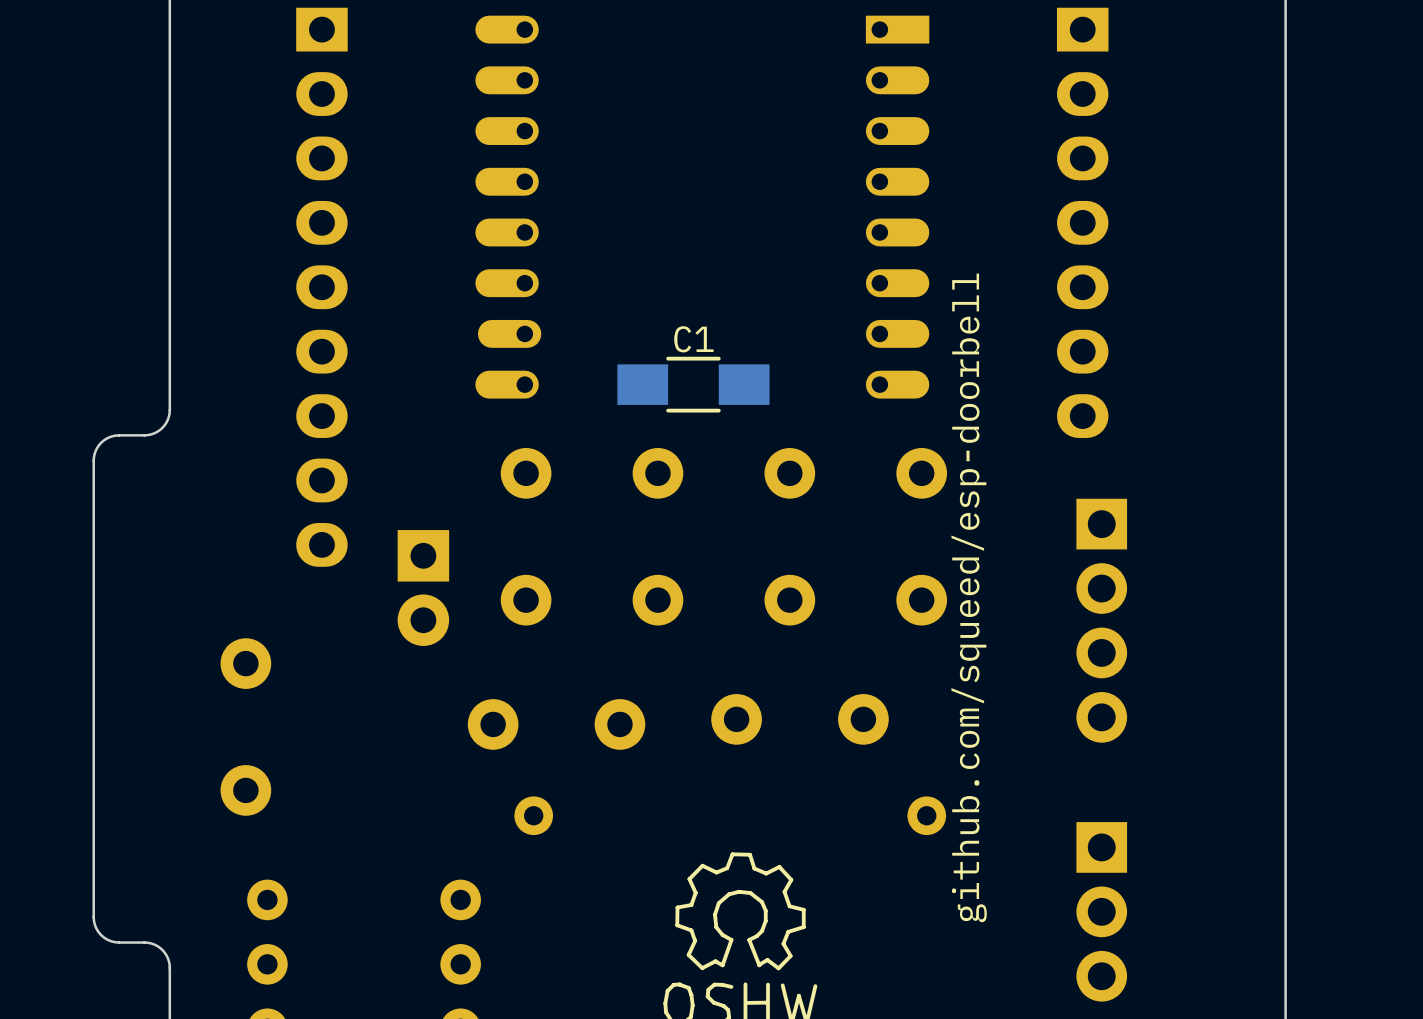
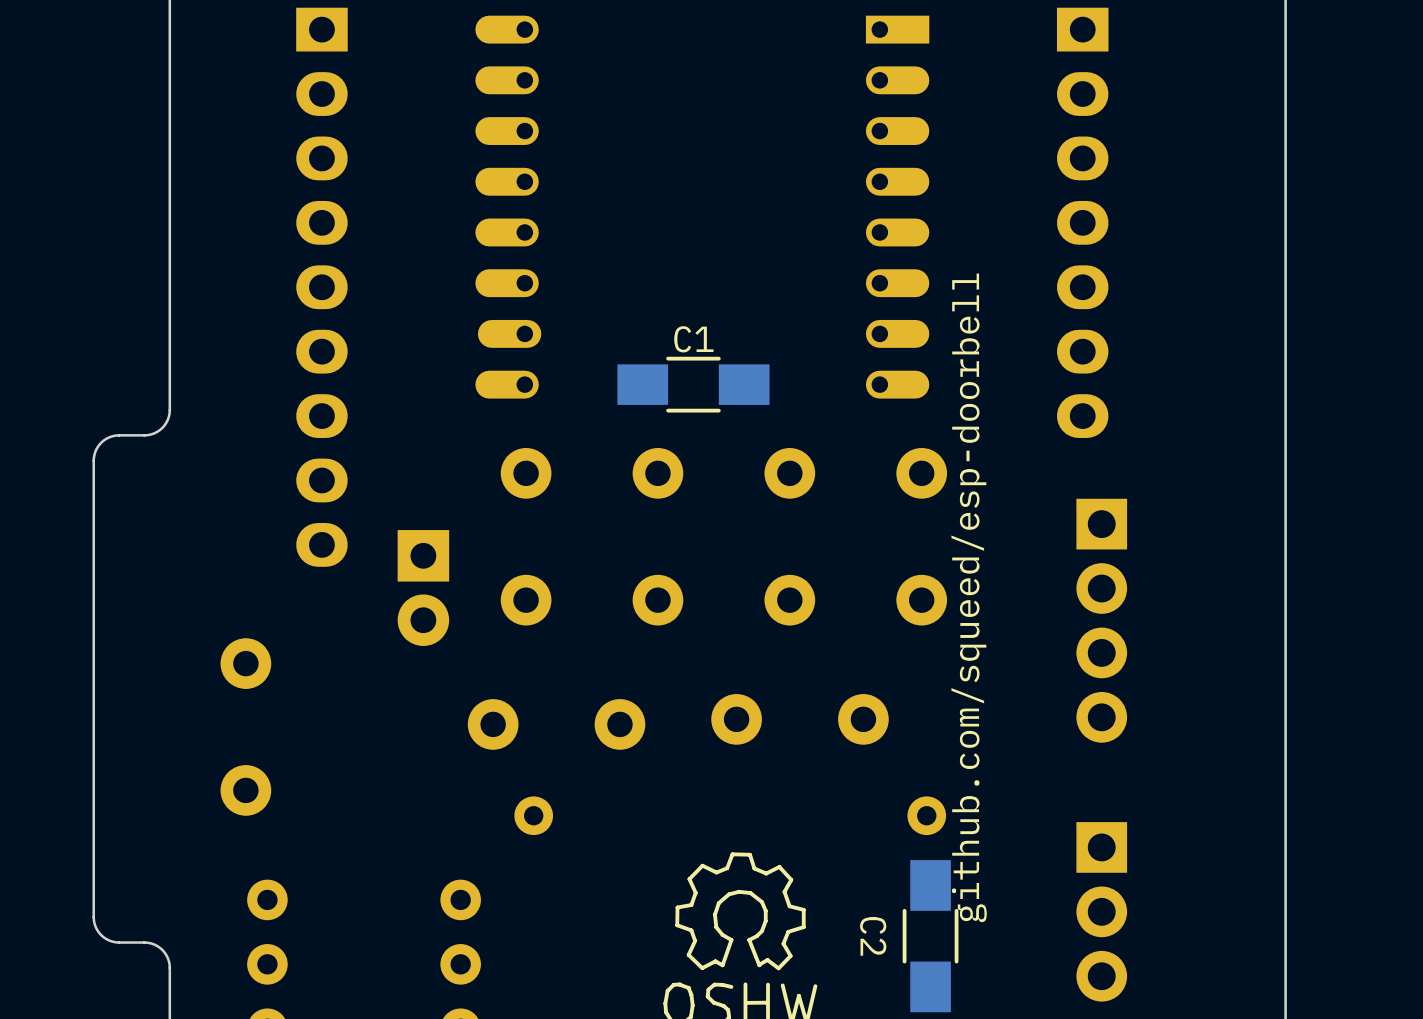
C2: none -> (930, 936)

